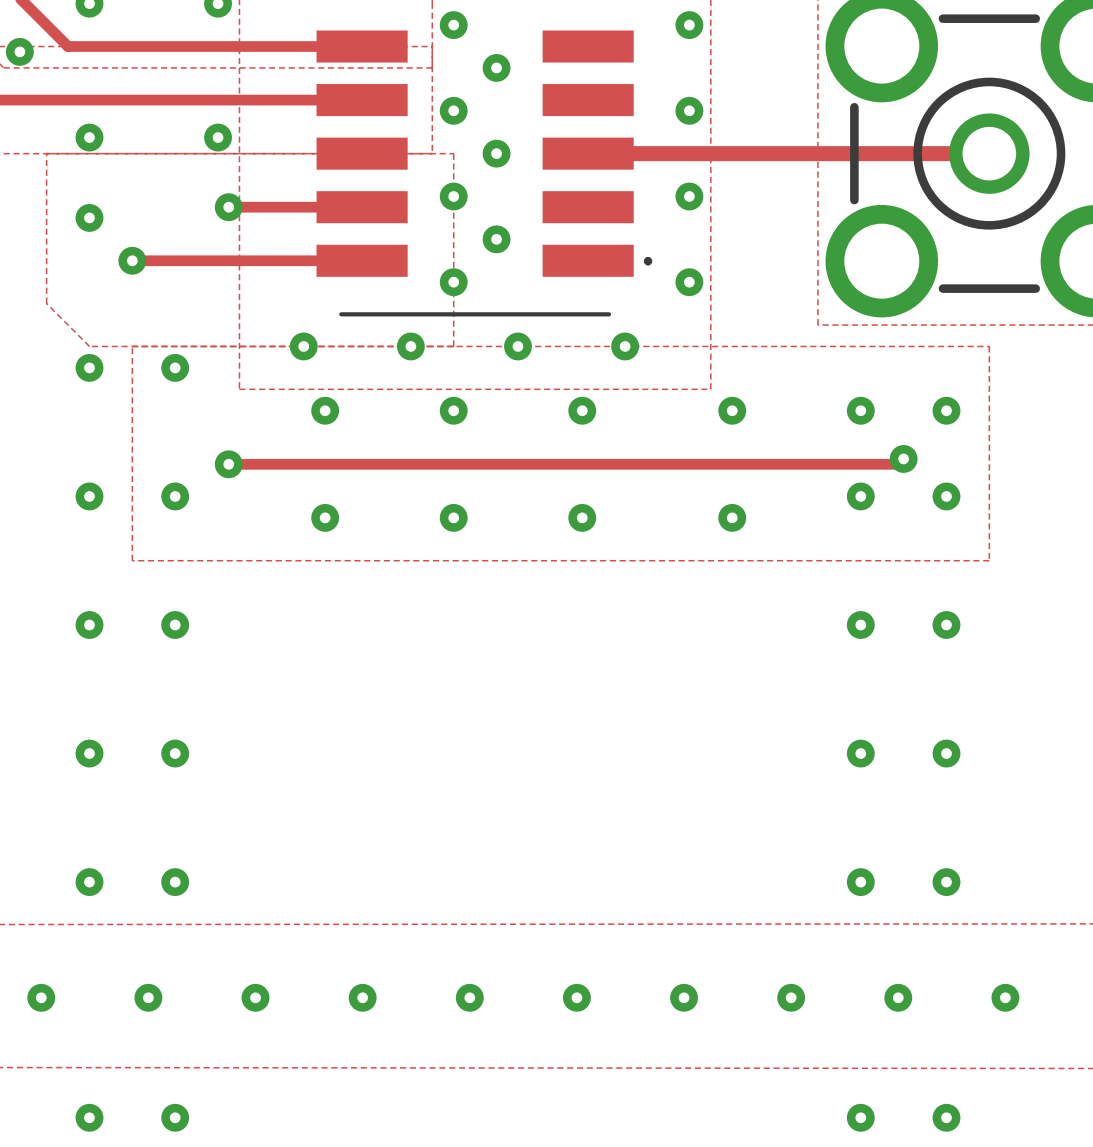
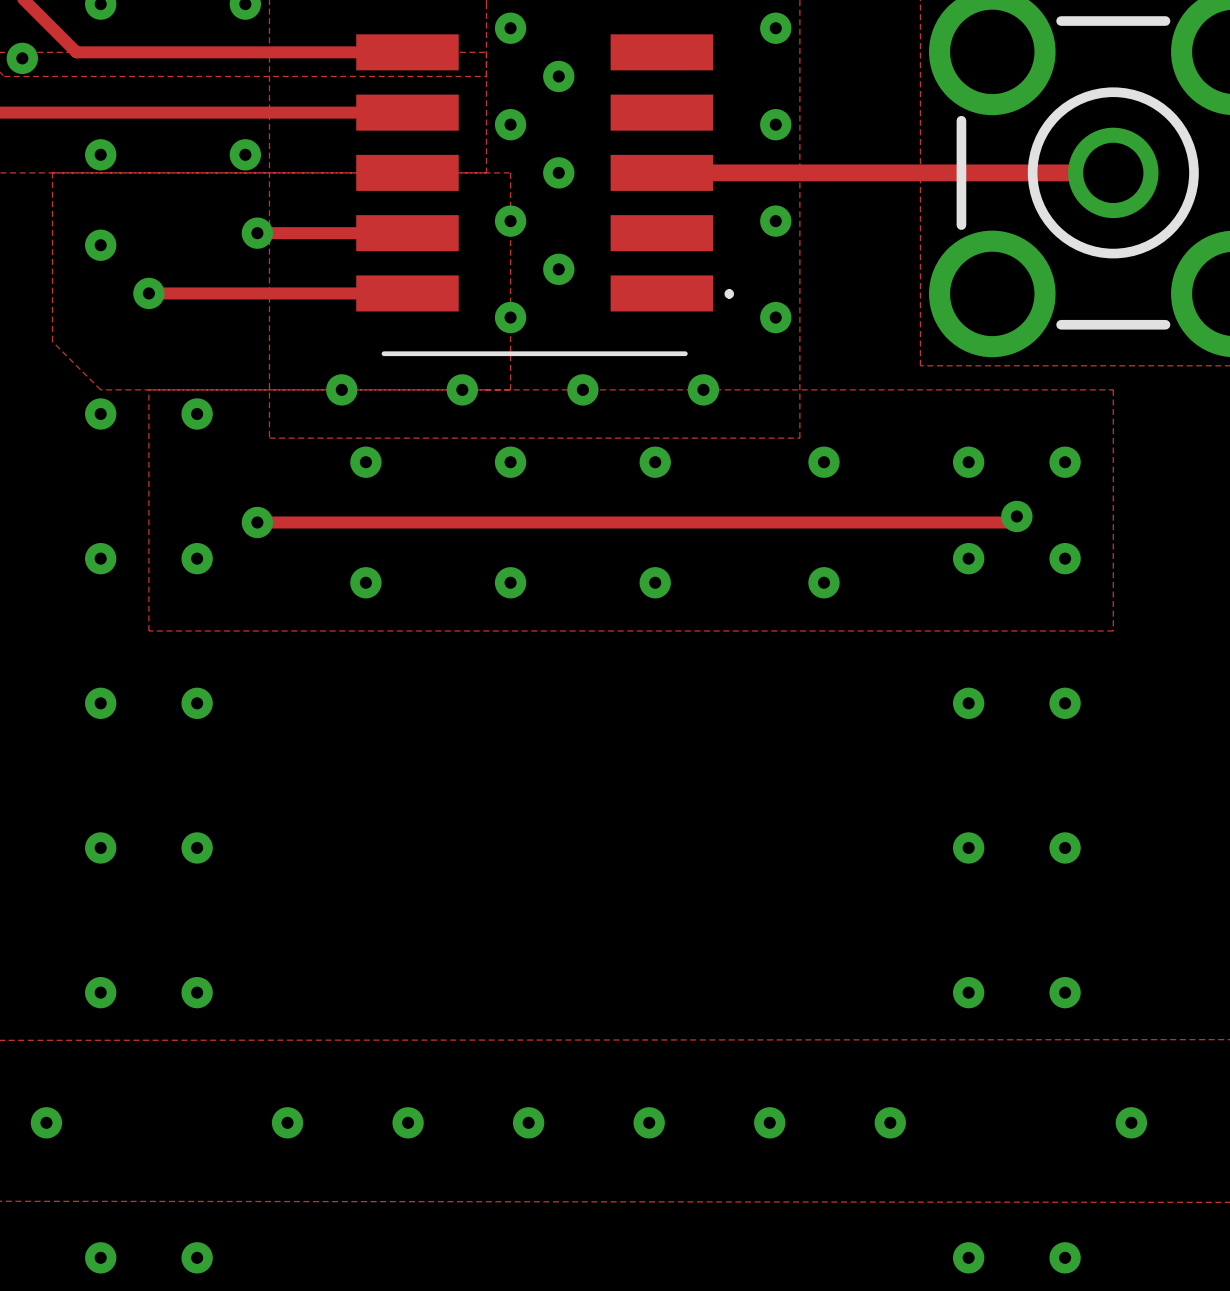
via: (148, 997) -> none
via: (898, 997) -> none

